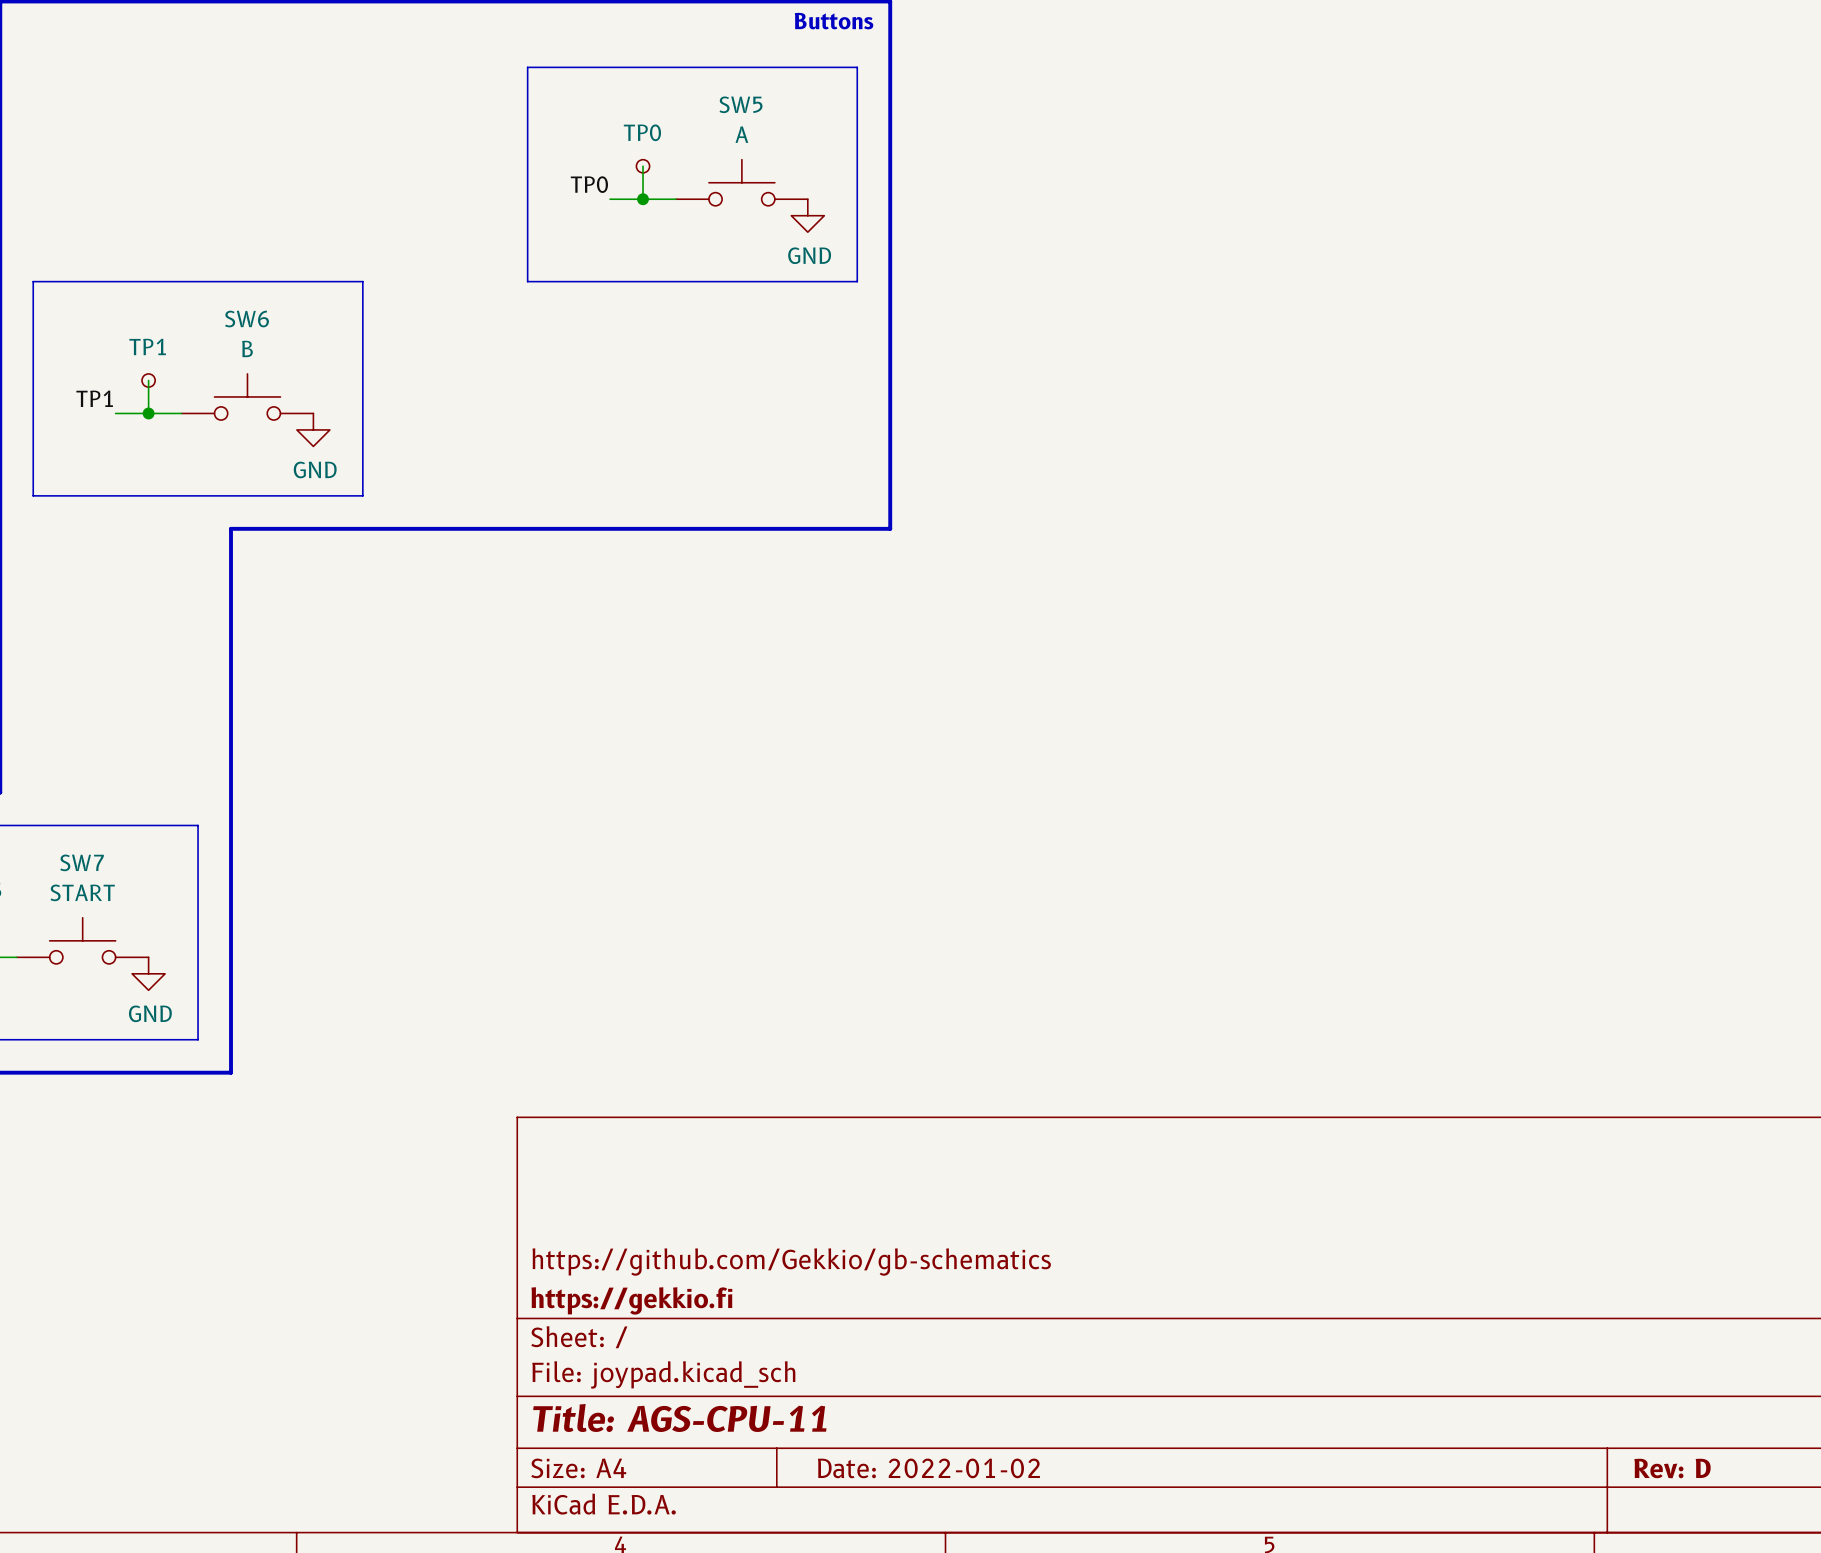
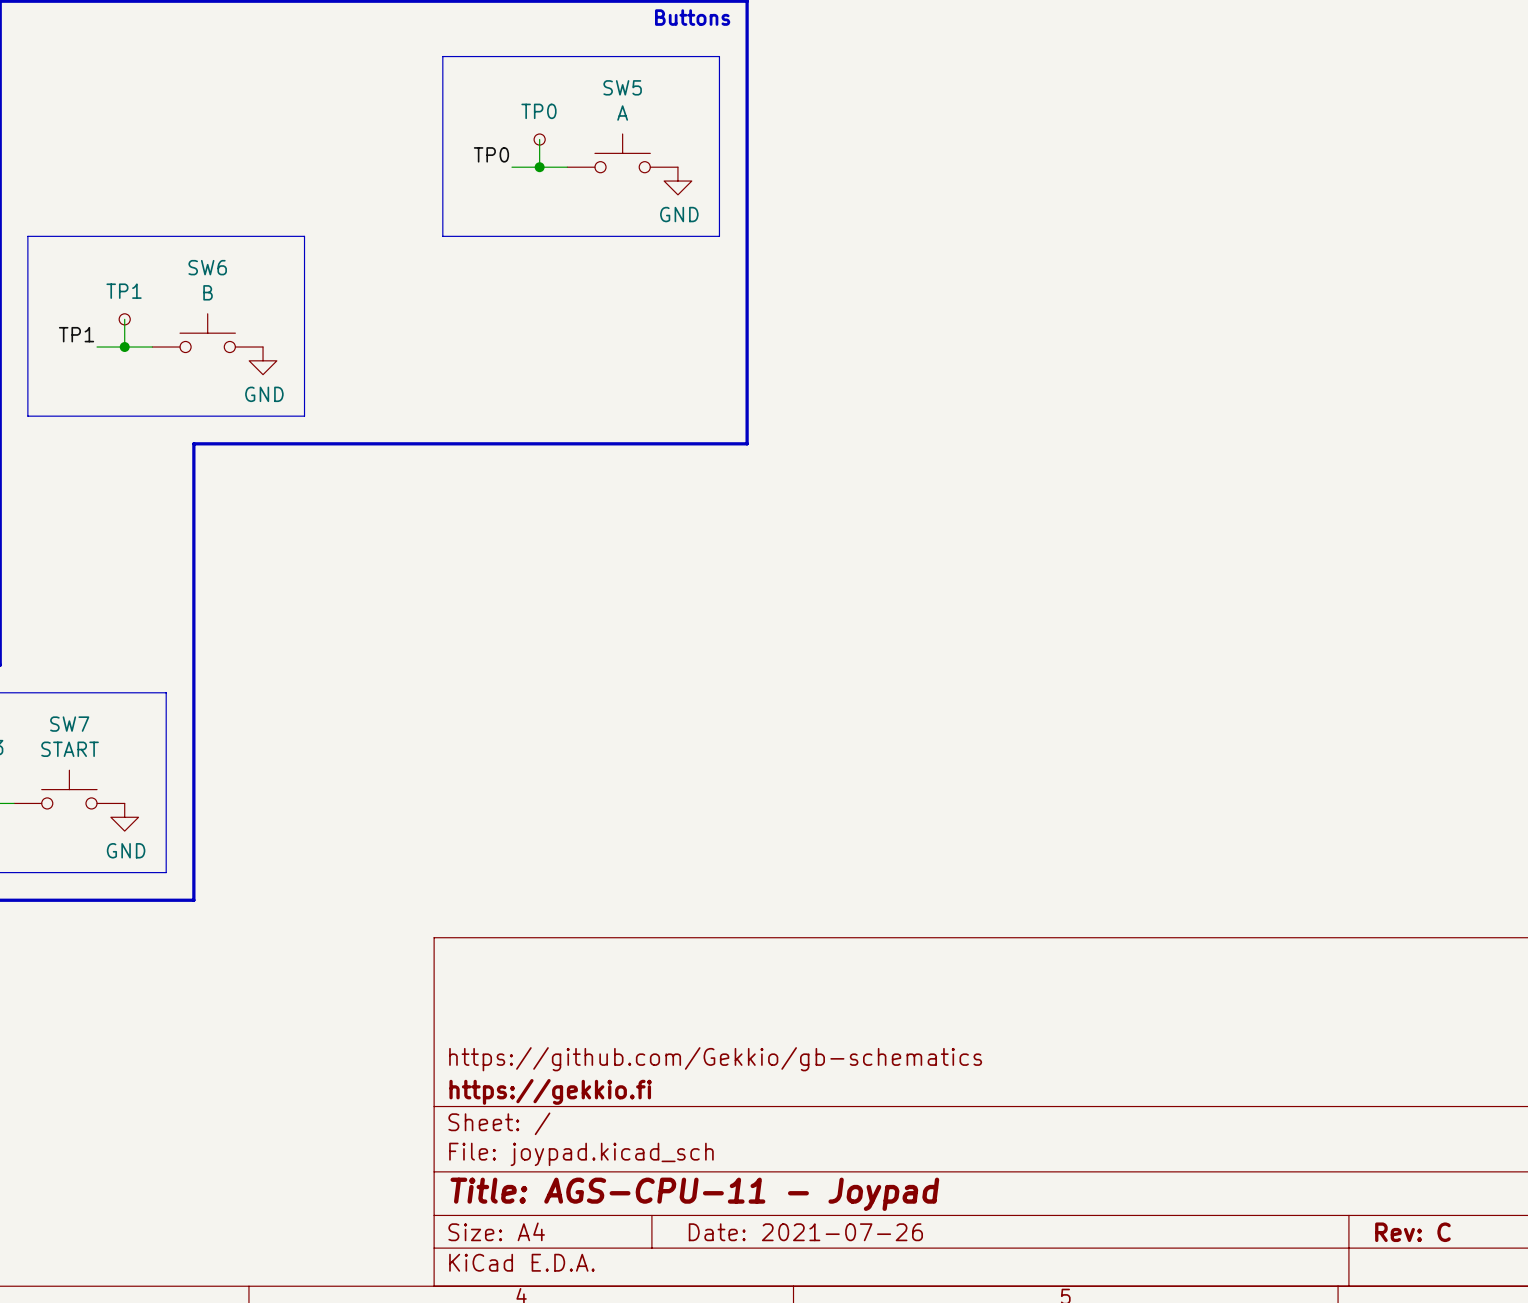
title block: Title: AGS-CPU-11 (679, 1417) -> Title: AGS-CPU-11 - Joypad (694, 1194)
title block: Date: 2022-01-02 (928, 1468) -> Date: 2021-07-26 (805, 1232)
title block: Rev: D (1672, 1468) -> Rev: C (1412, 1232)

